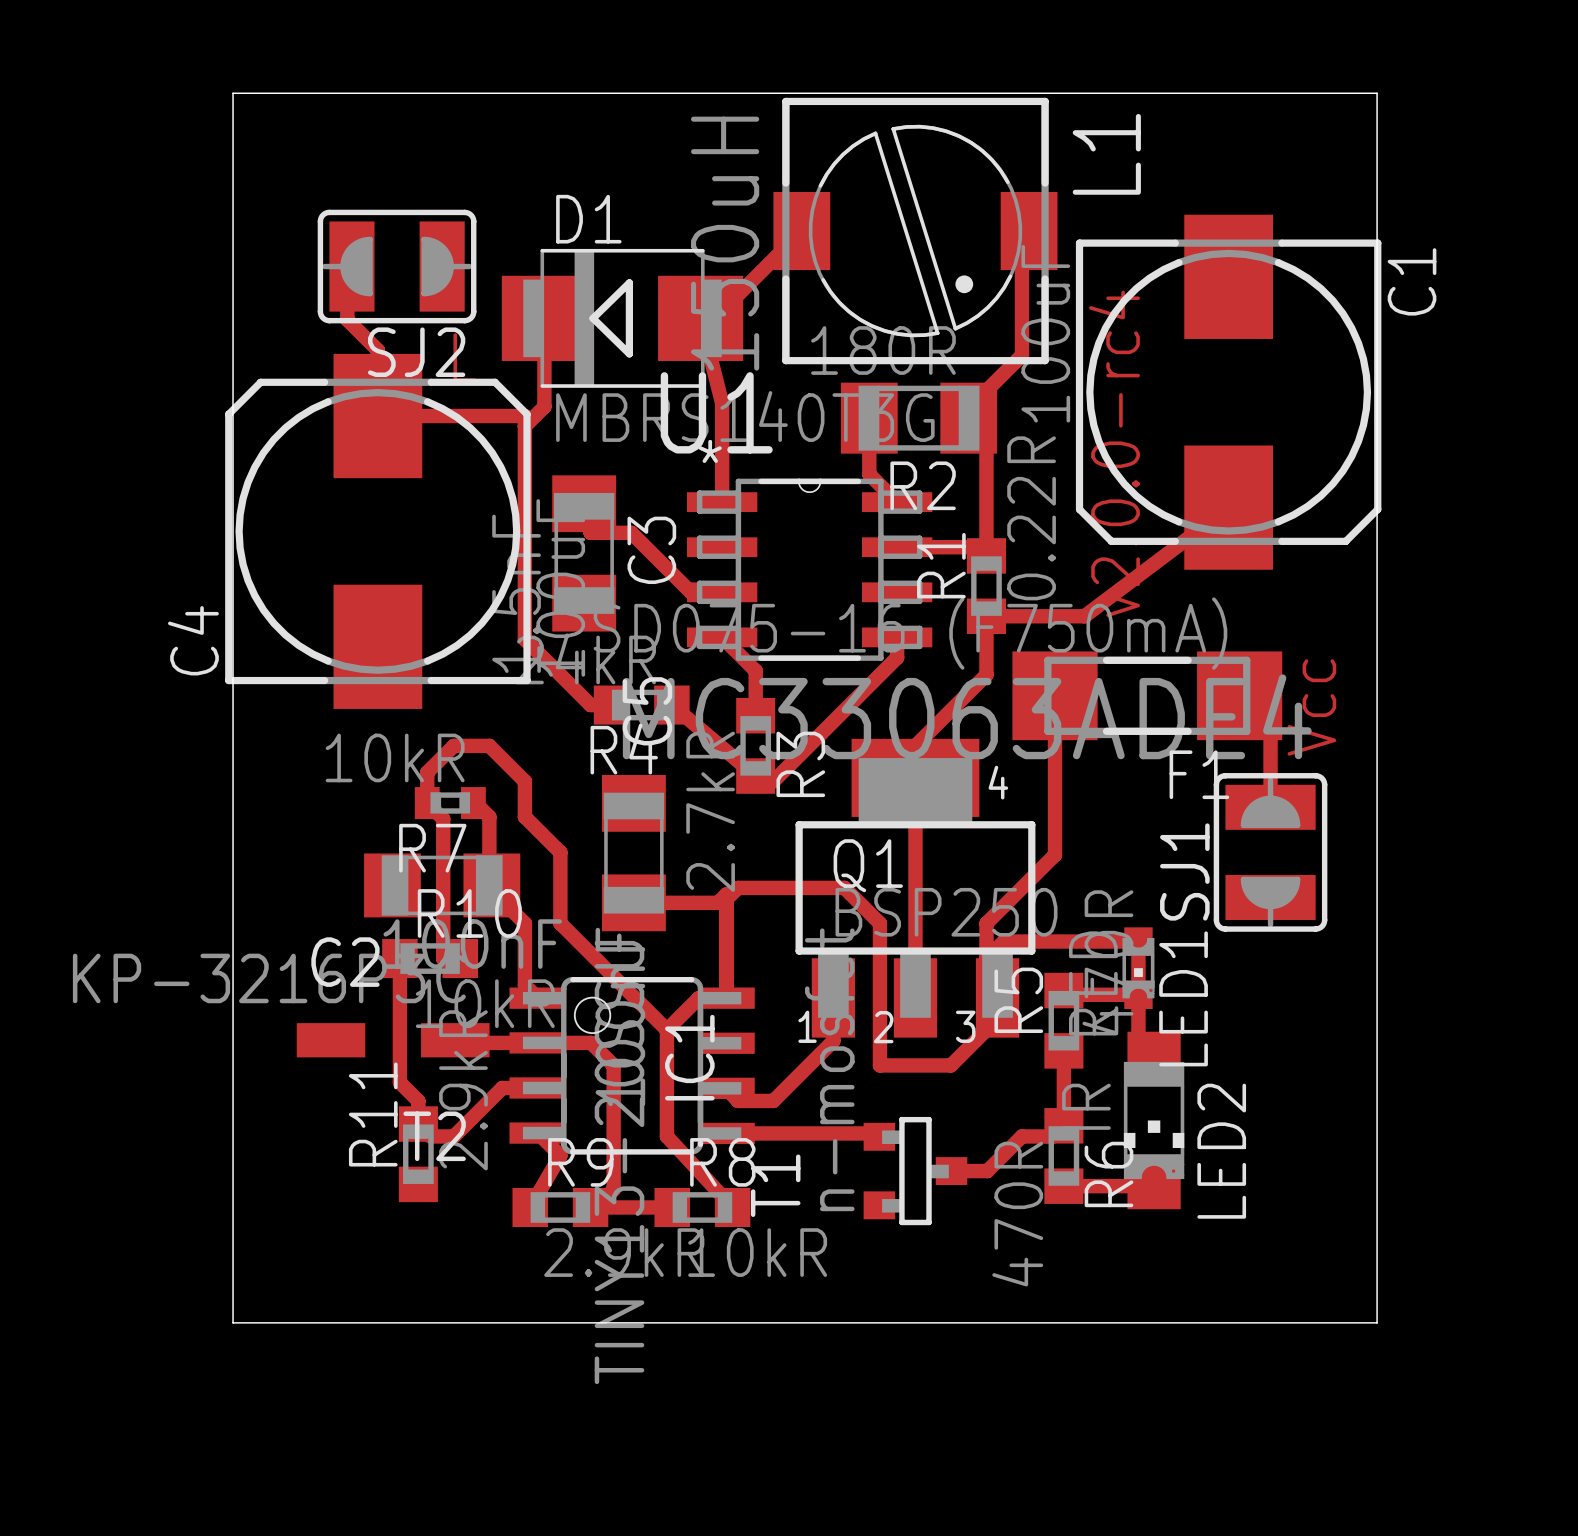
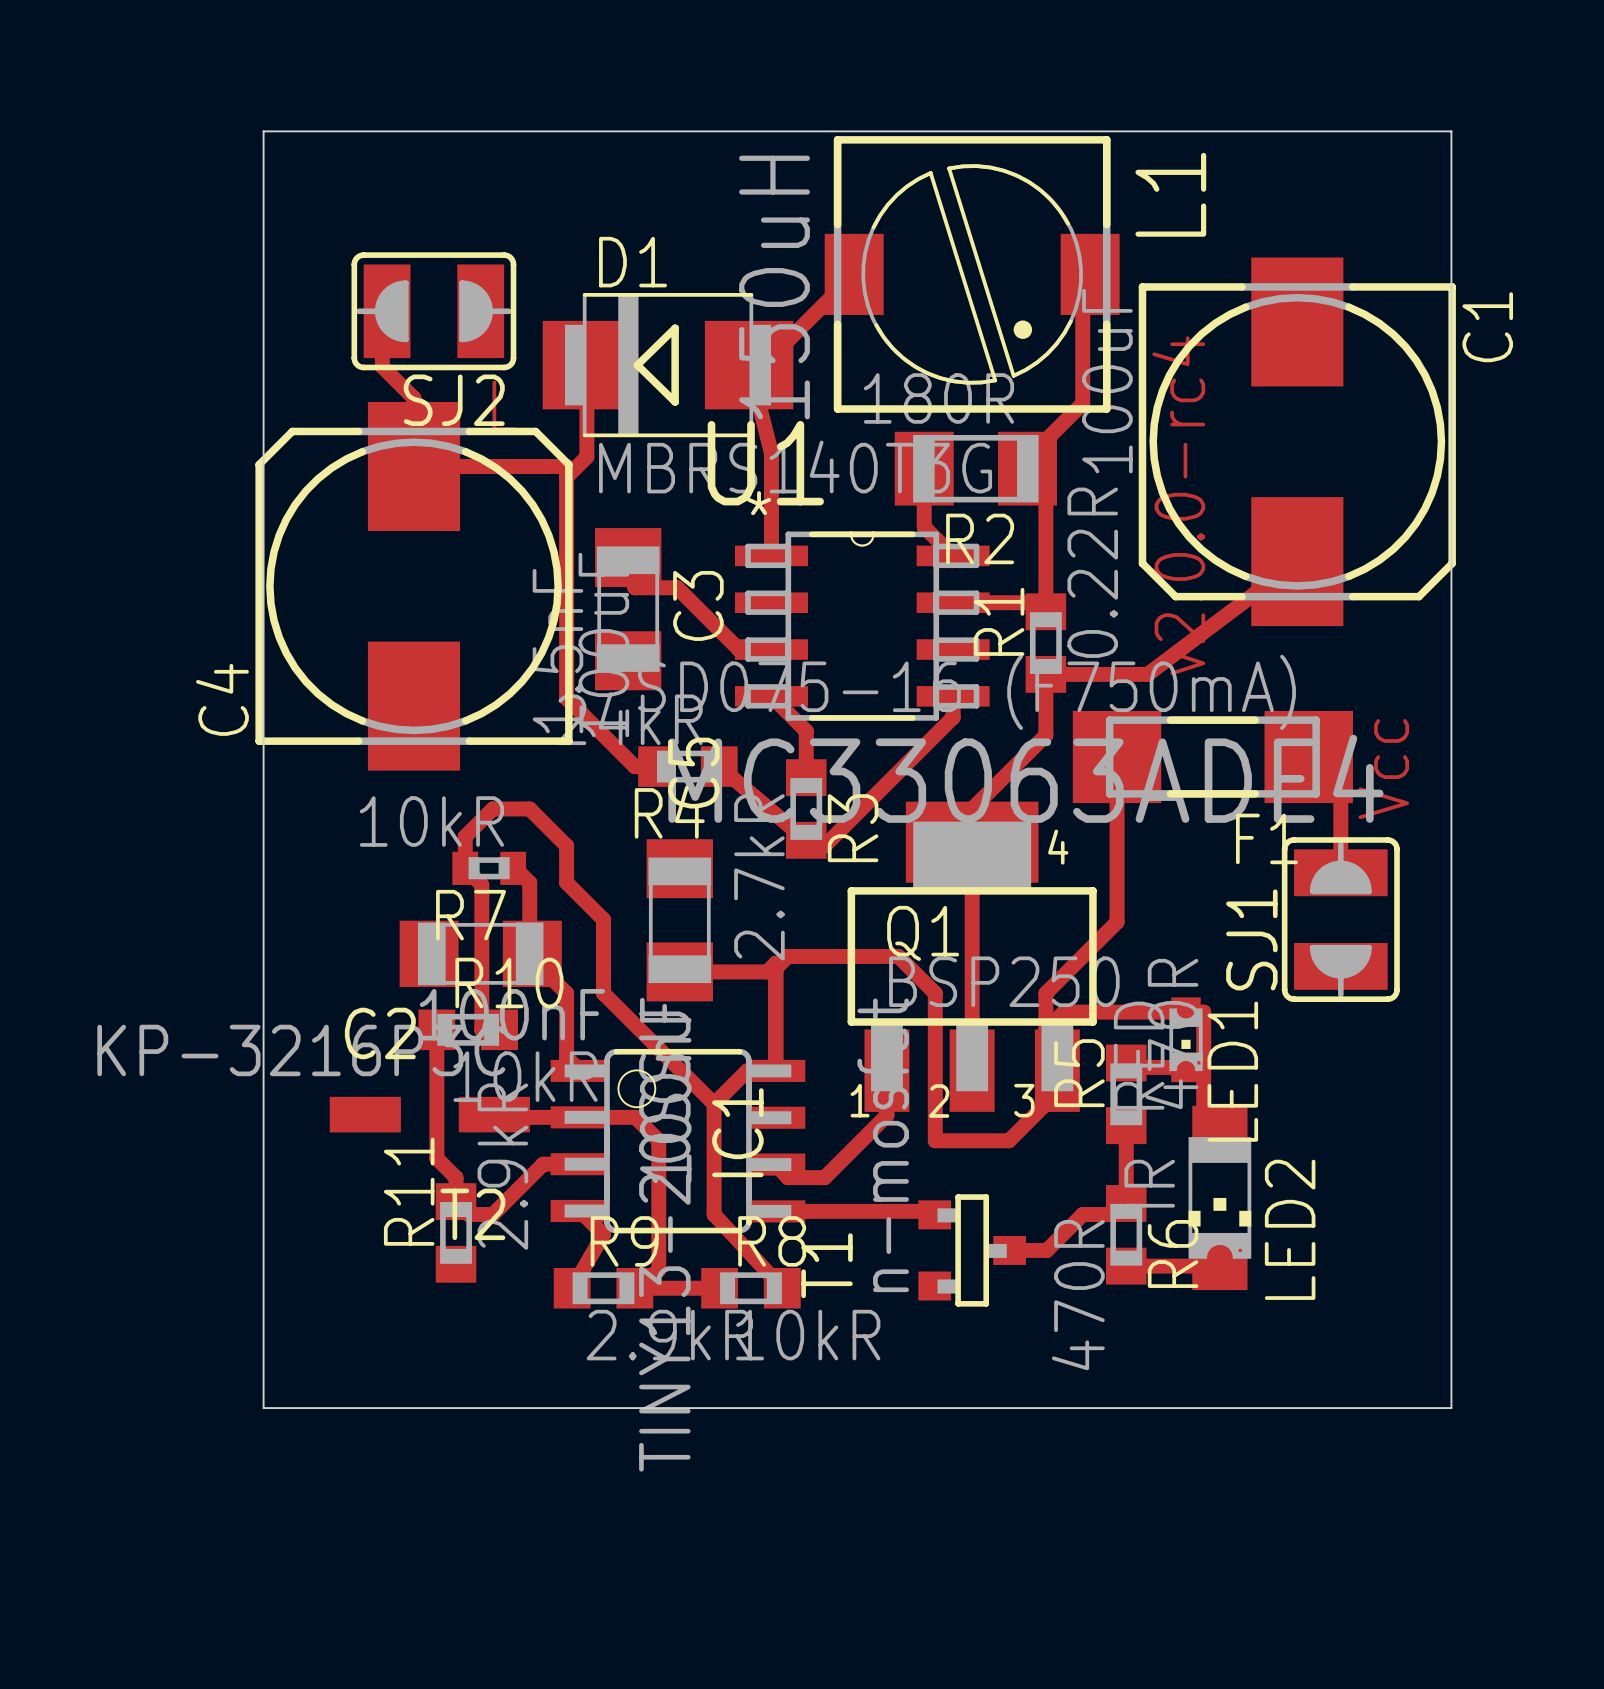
LED1 position: (1138, 968) -> (1185, 1039)

